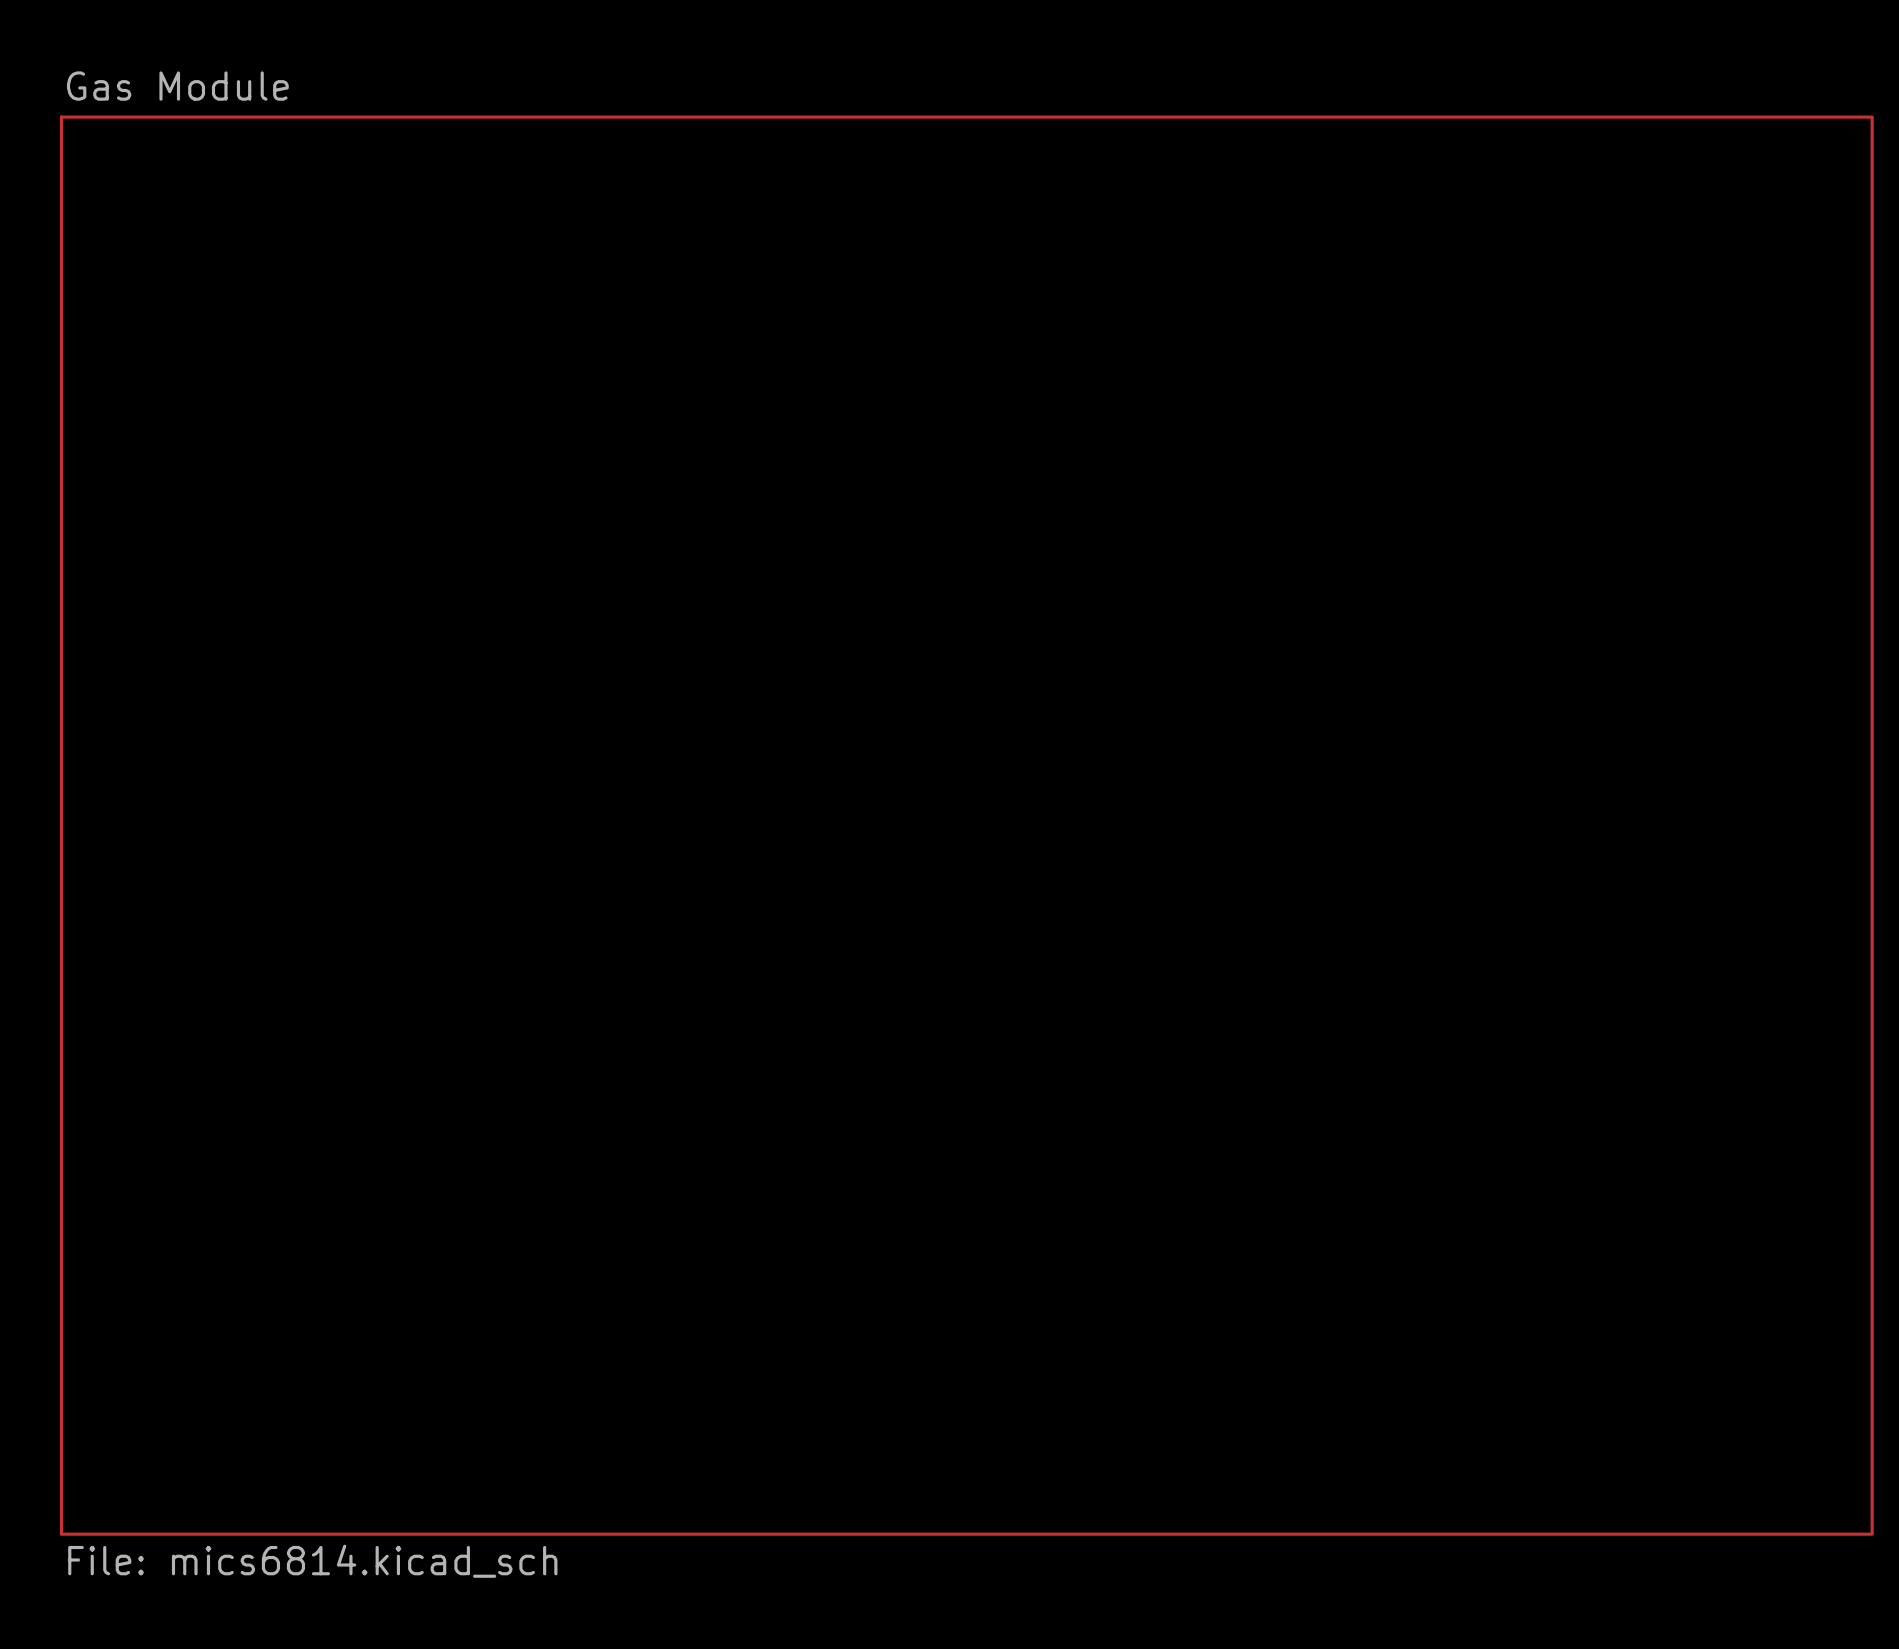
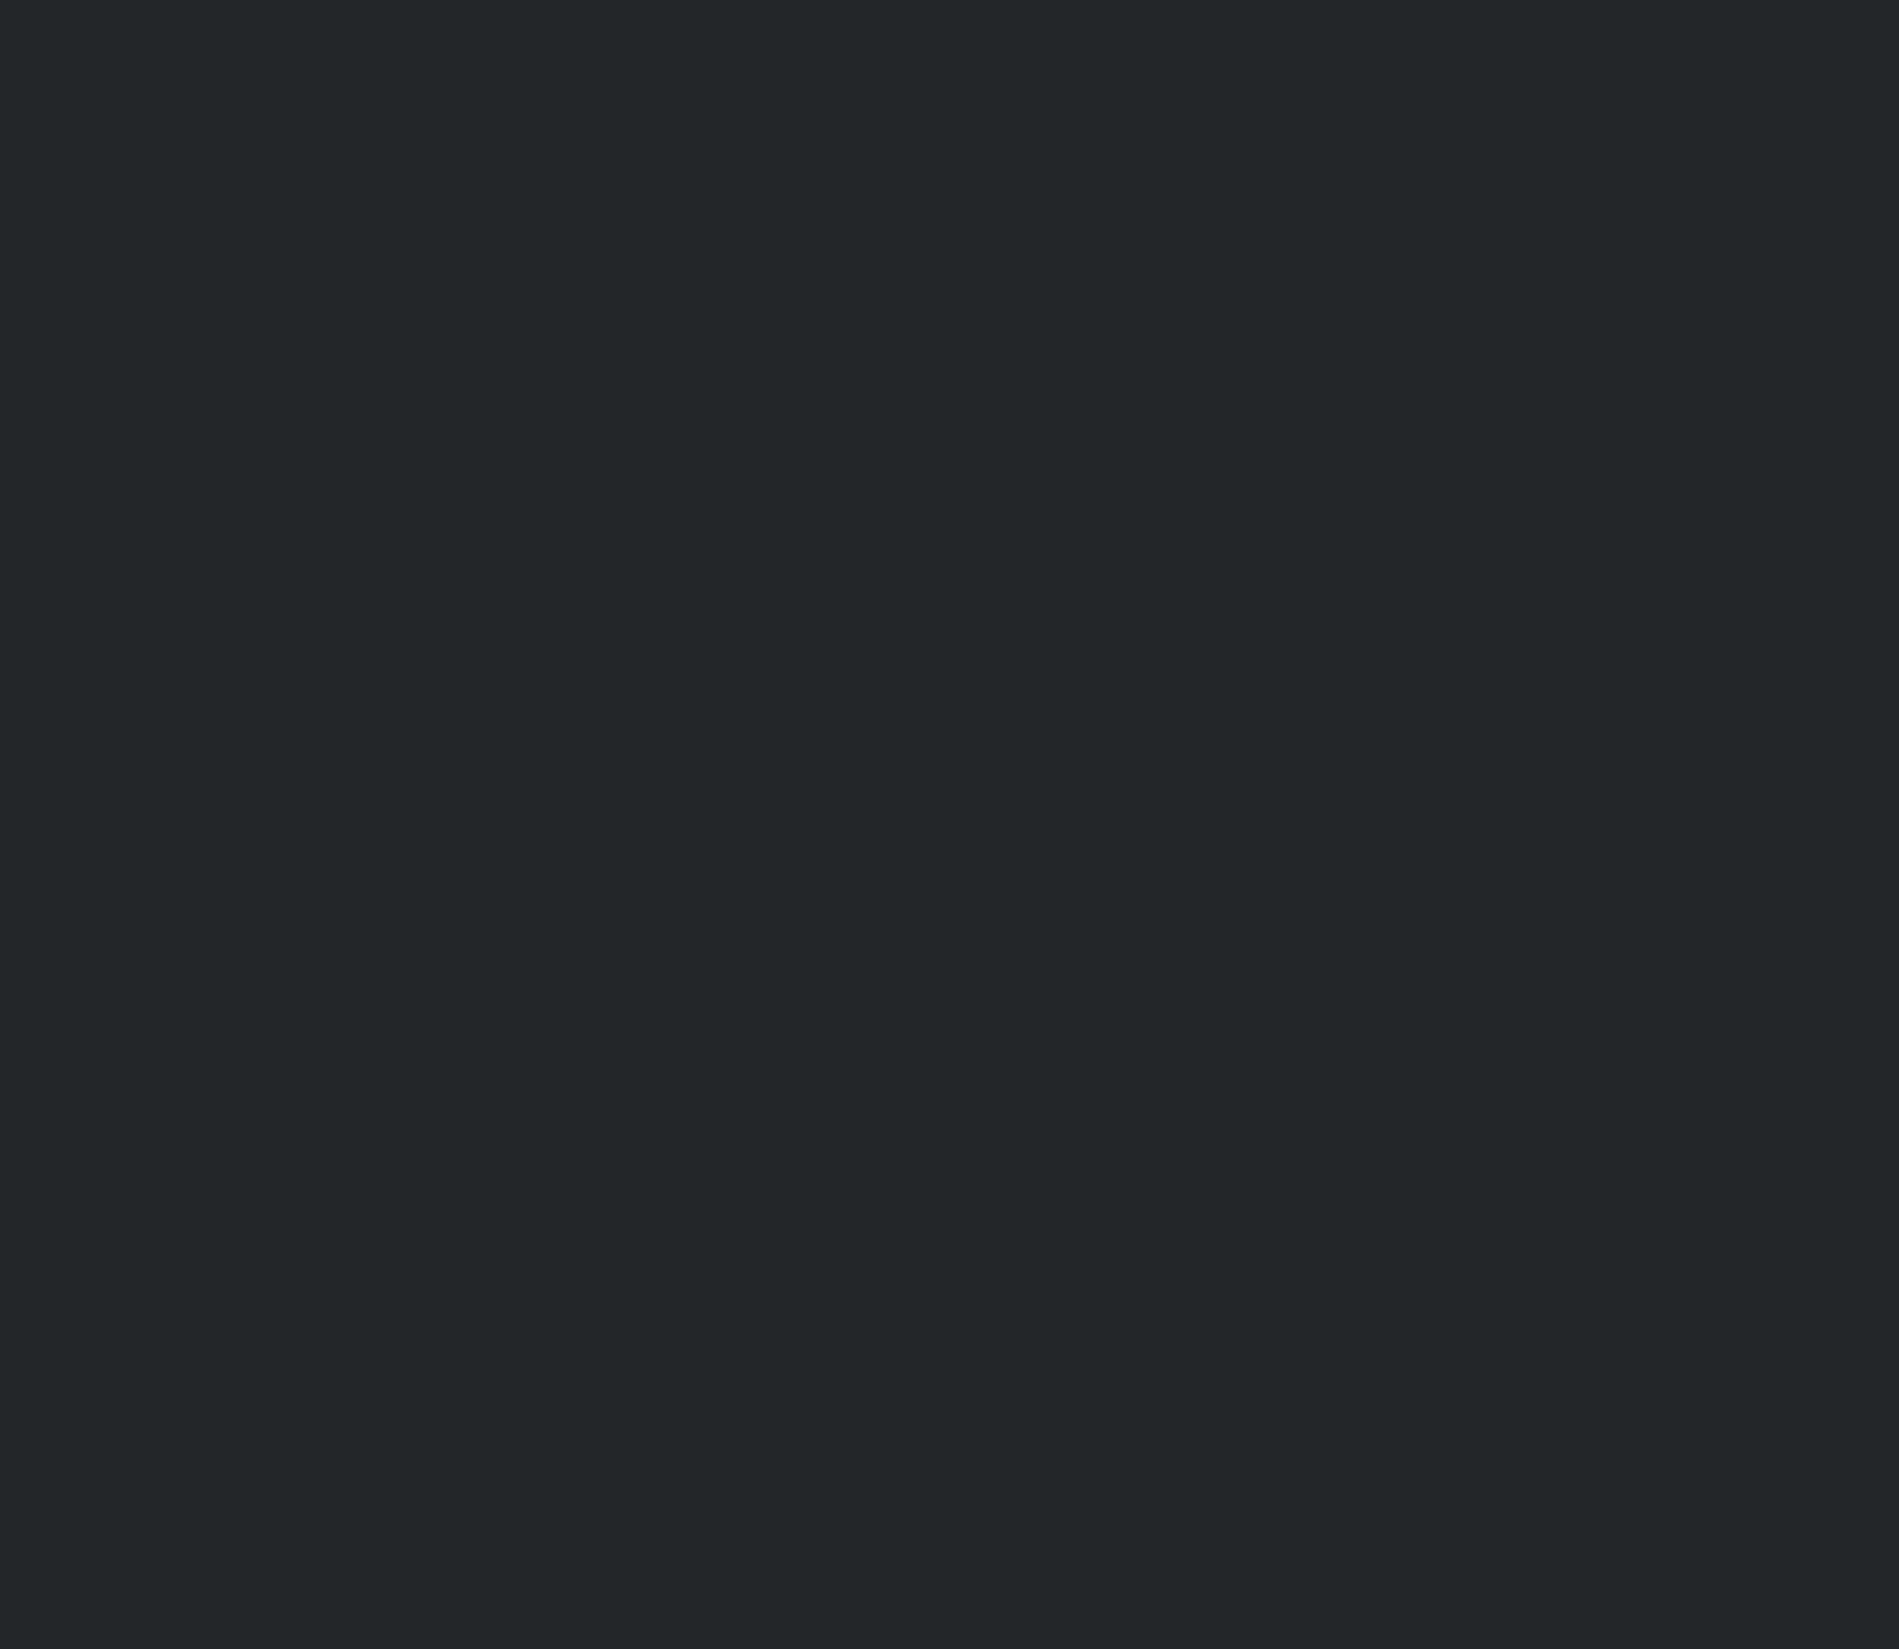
sheet Gas Module: File: mics6814.kicad_sch (966, 825) -> none

